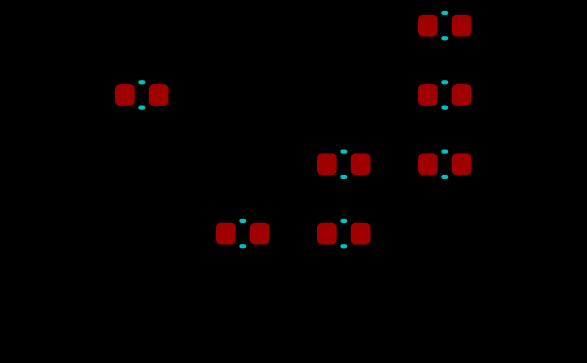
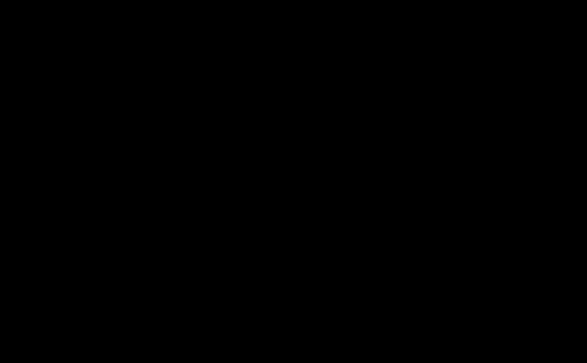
part: (444, 25) -> none
part: (141, 94) -> none
part: (444, 94) -> none
part: (343, 164) -> none
part: (444, 164) -> none
part: (242, 233) -> none
part: (343, 233) -> none

